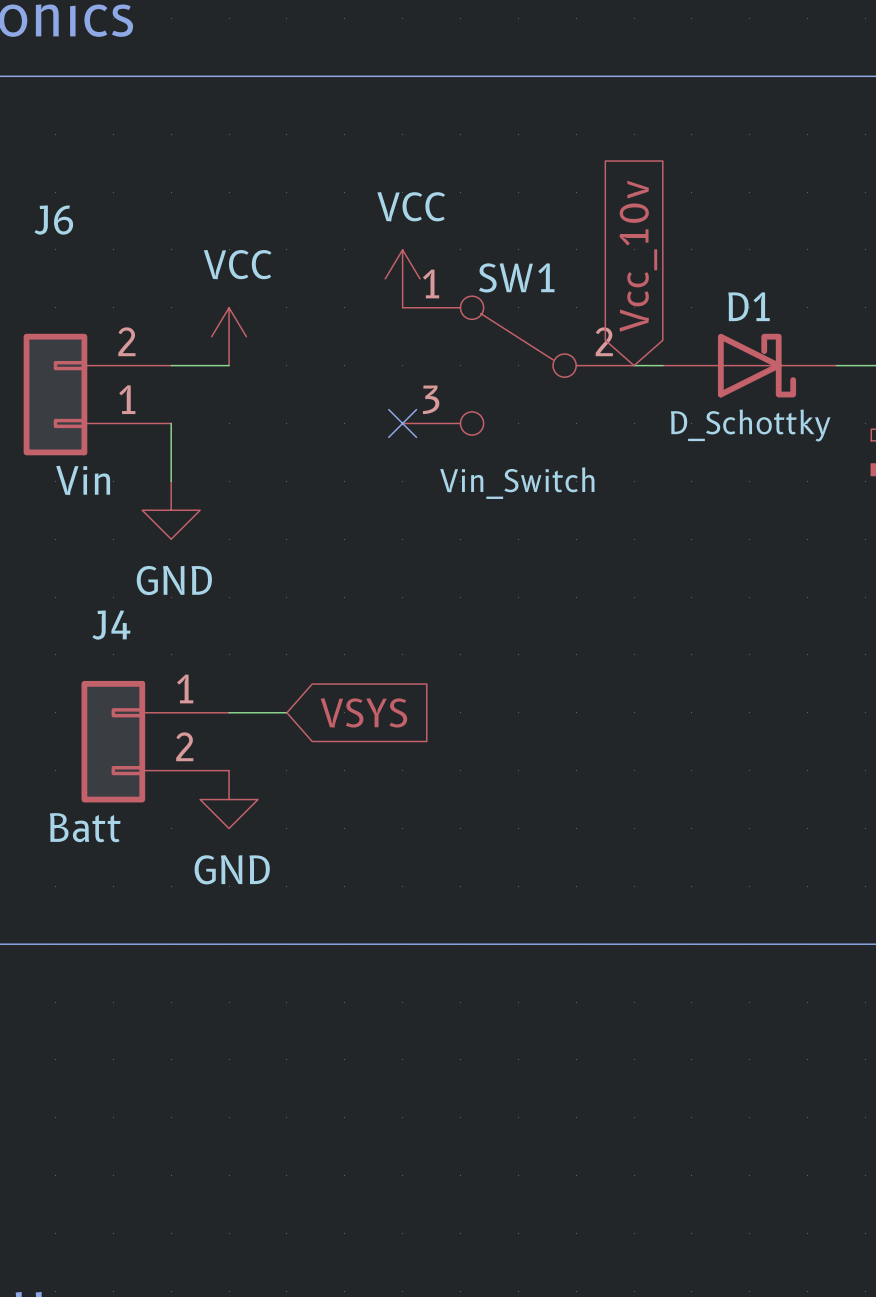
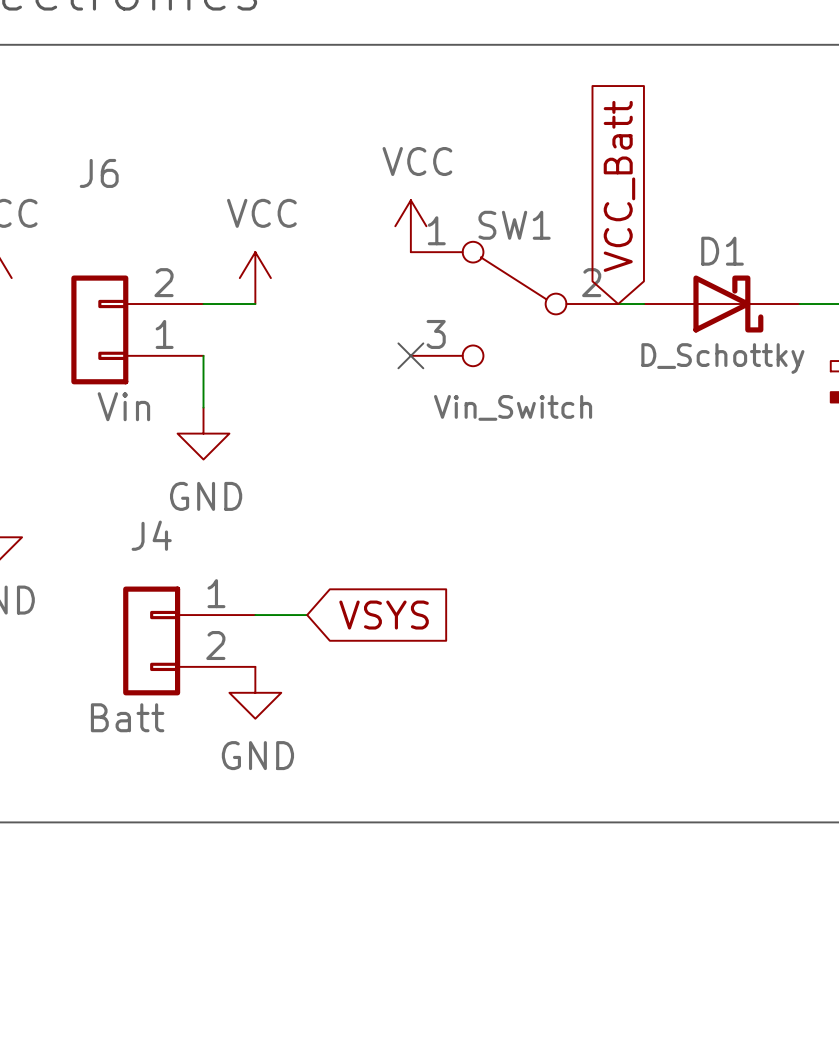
global label: Vcc_10v (638, 256) -> VCC_Batt (619, 186)

